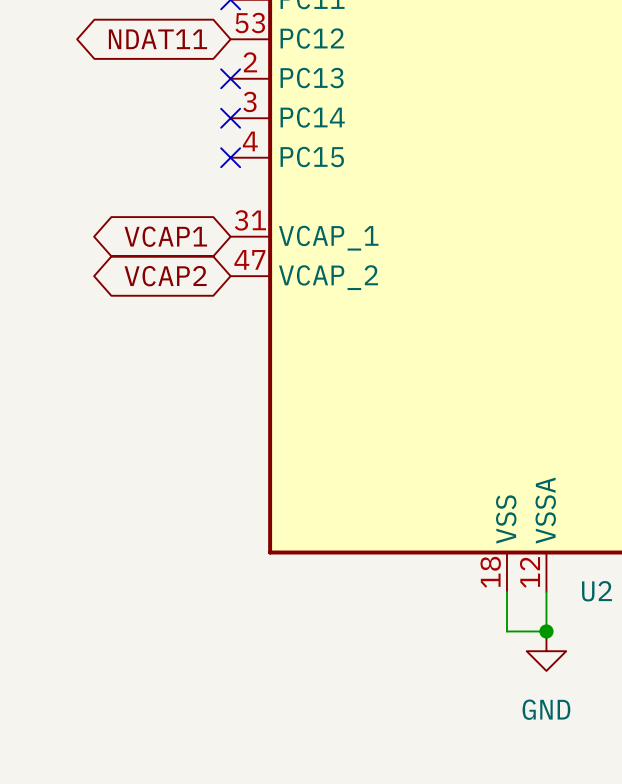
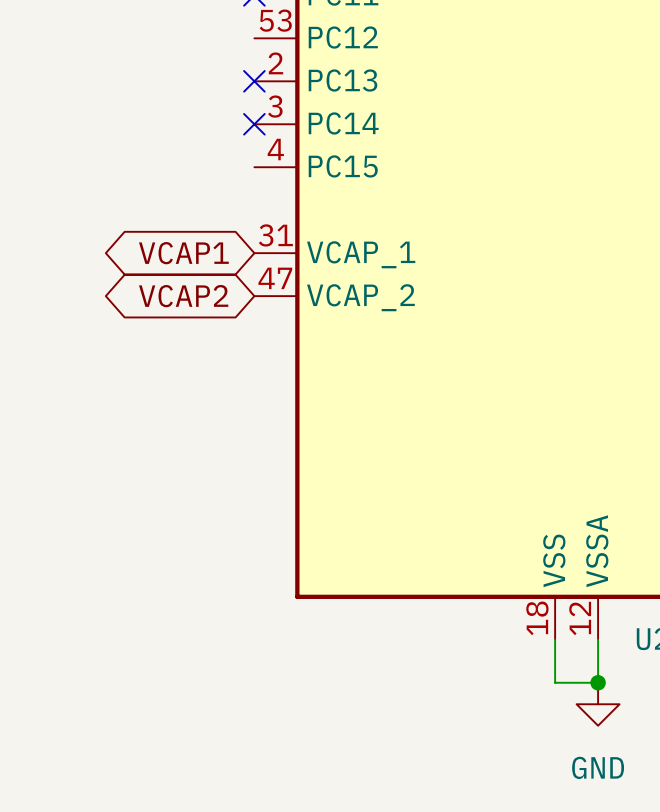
global label: NDAT11 (157, 39) -> none
no-connect mark: (230, 157) -> none

